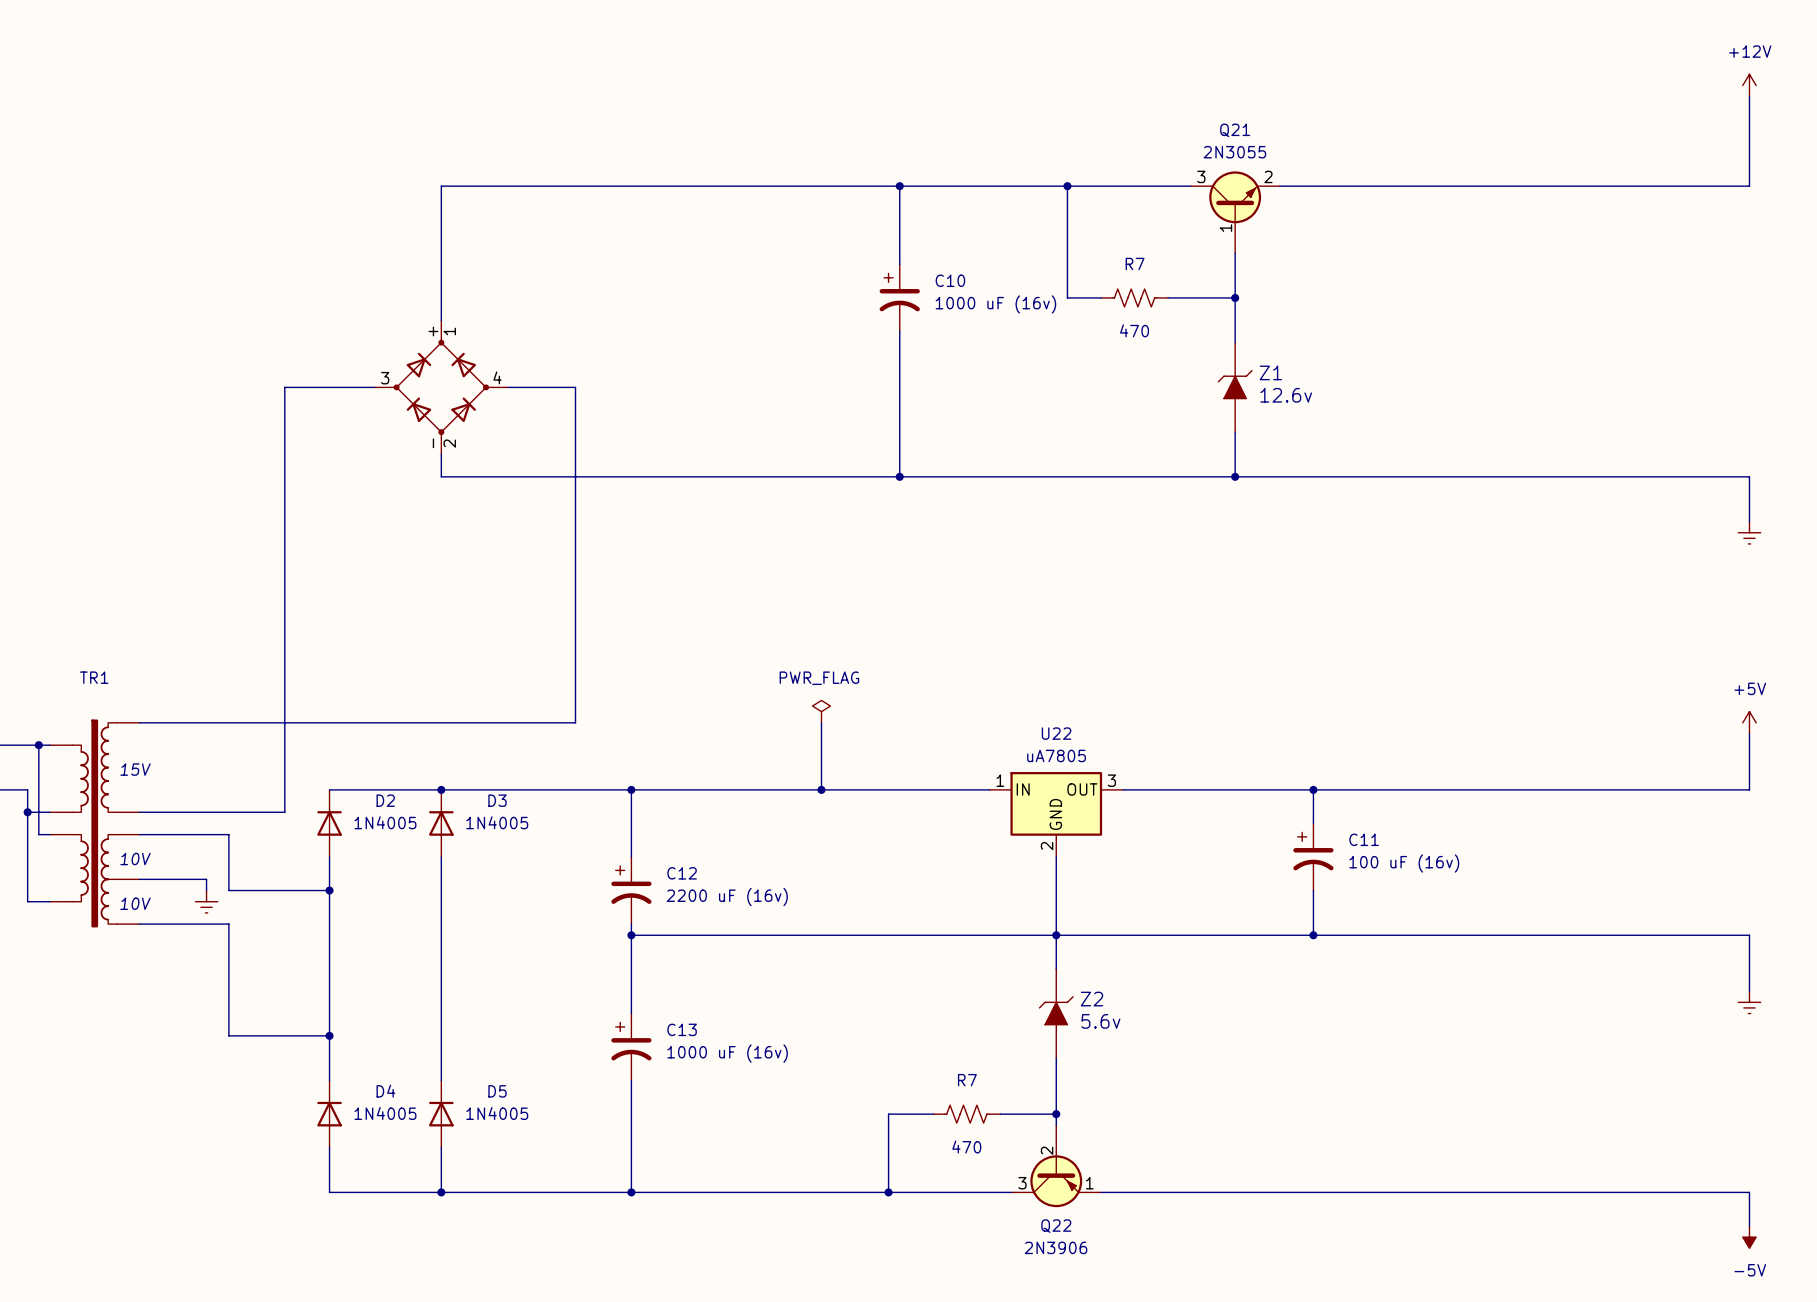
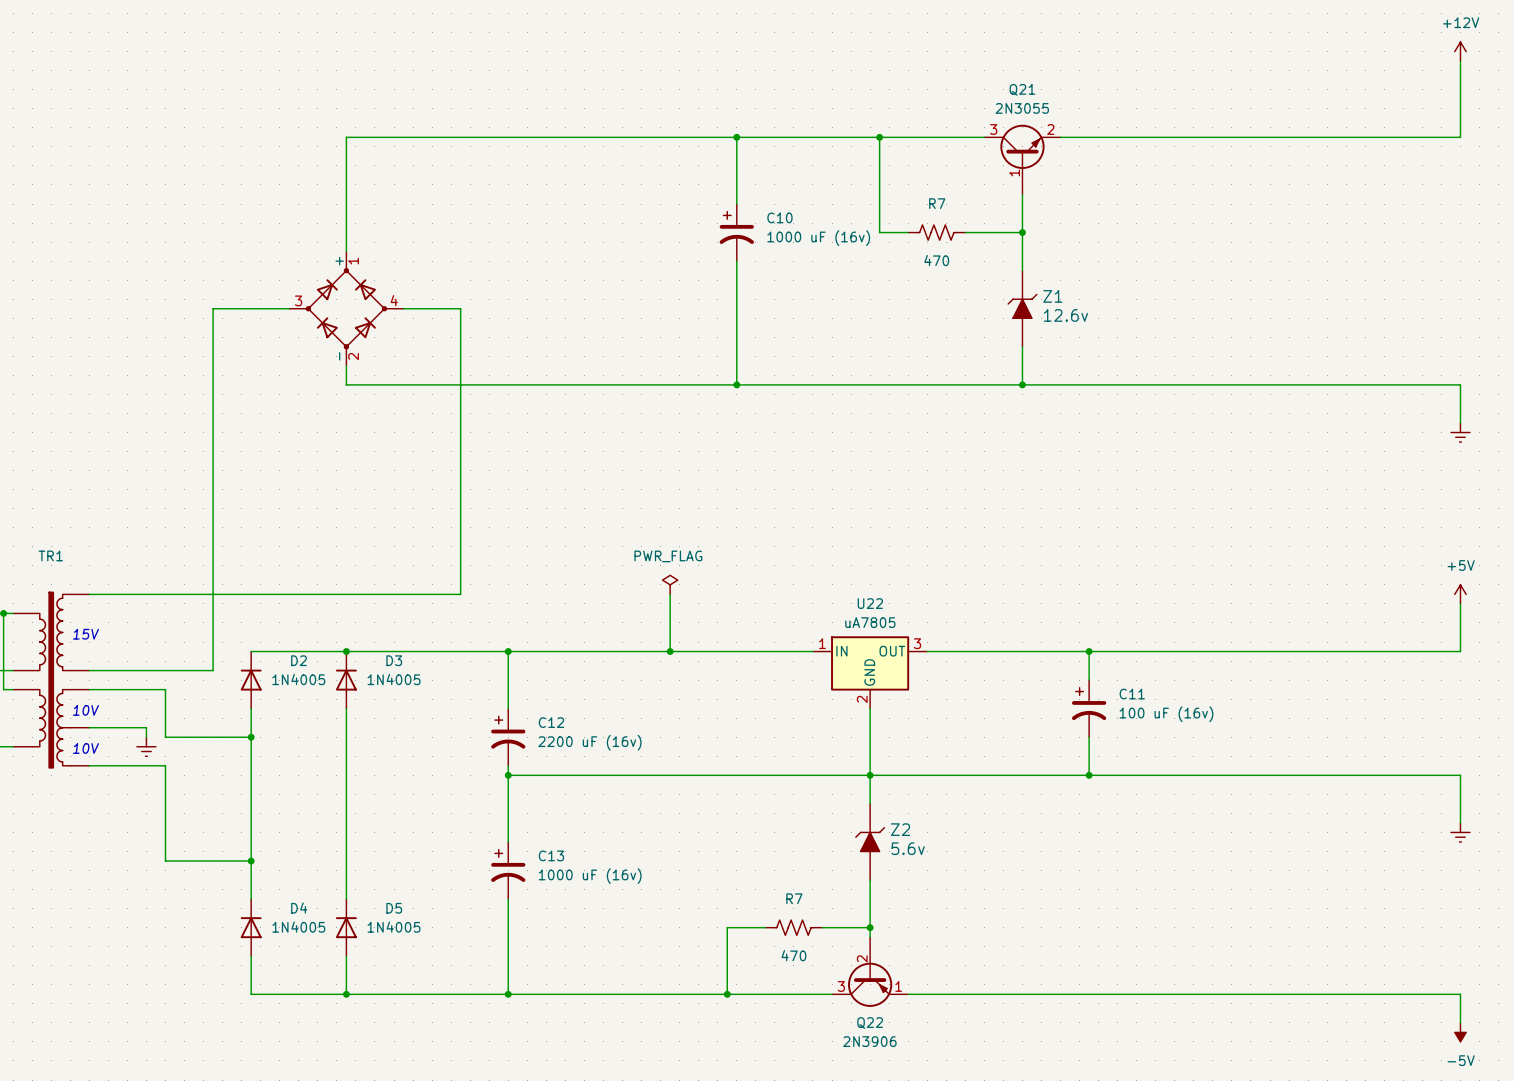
Q21 symbol: [1190, 171, 1280, 254] -> [984, 124, 1061, 195]
Q22 symbol: [1011, 1125, 1102, 1208] -> [832, 937, 909, 1007]

